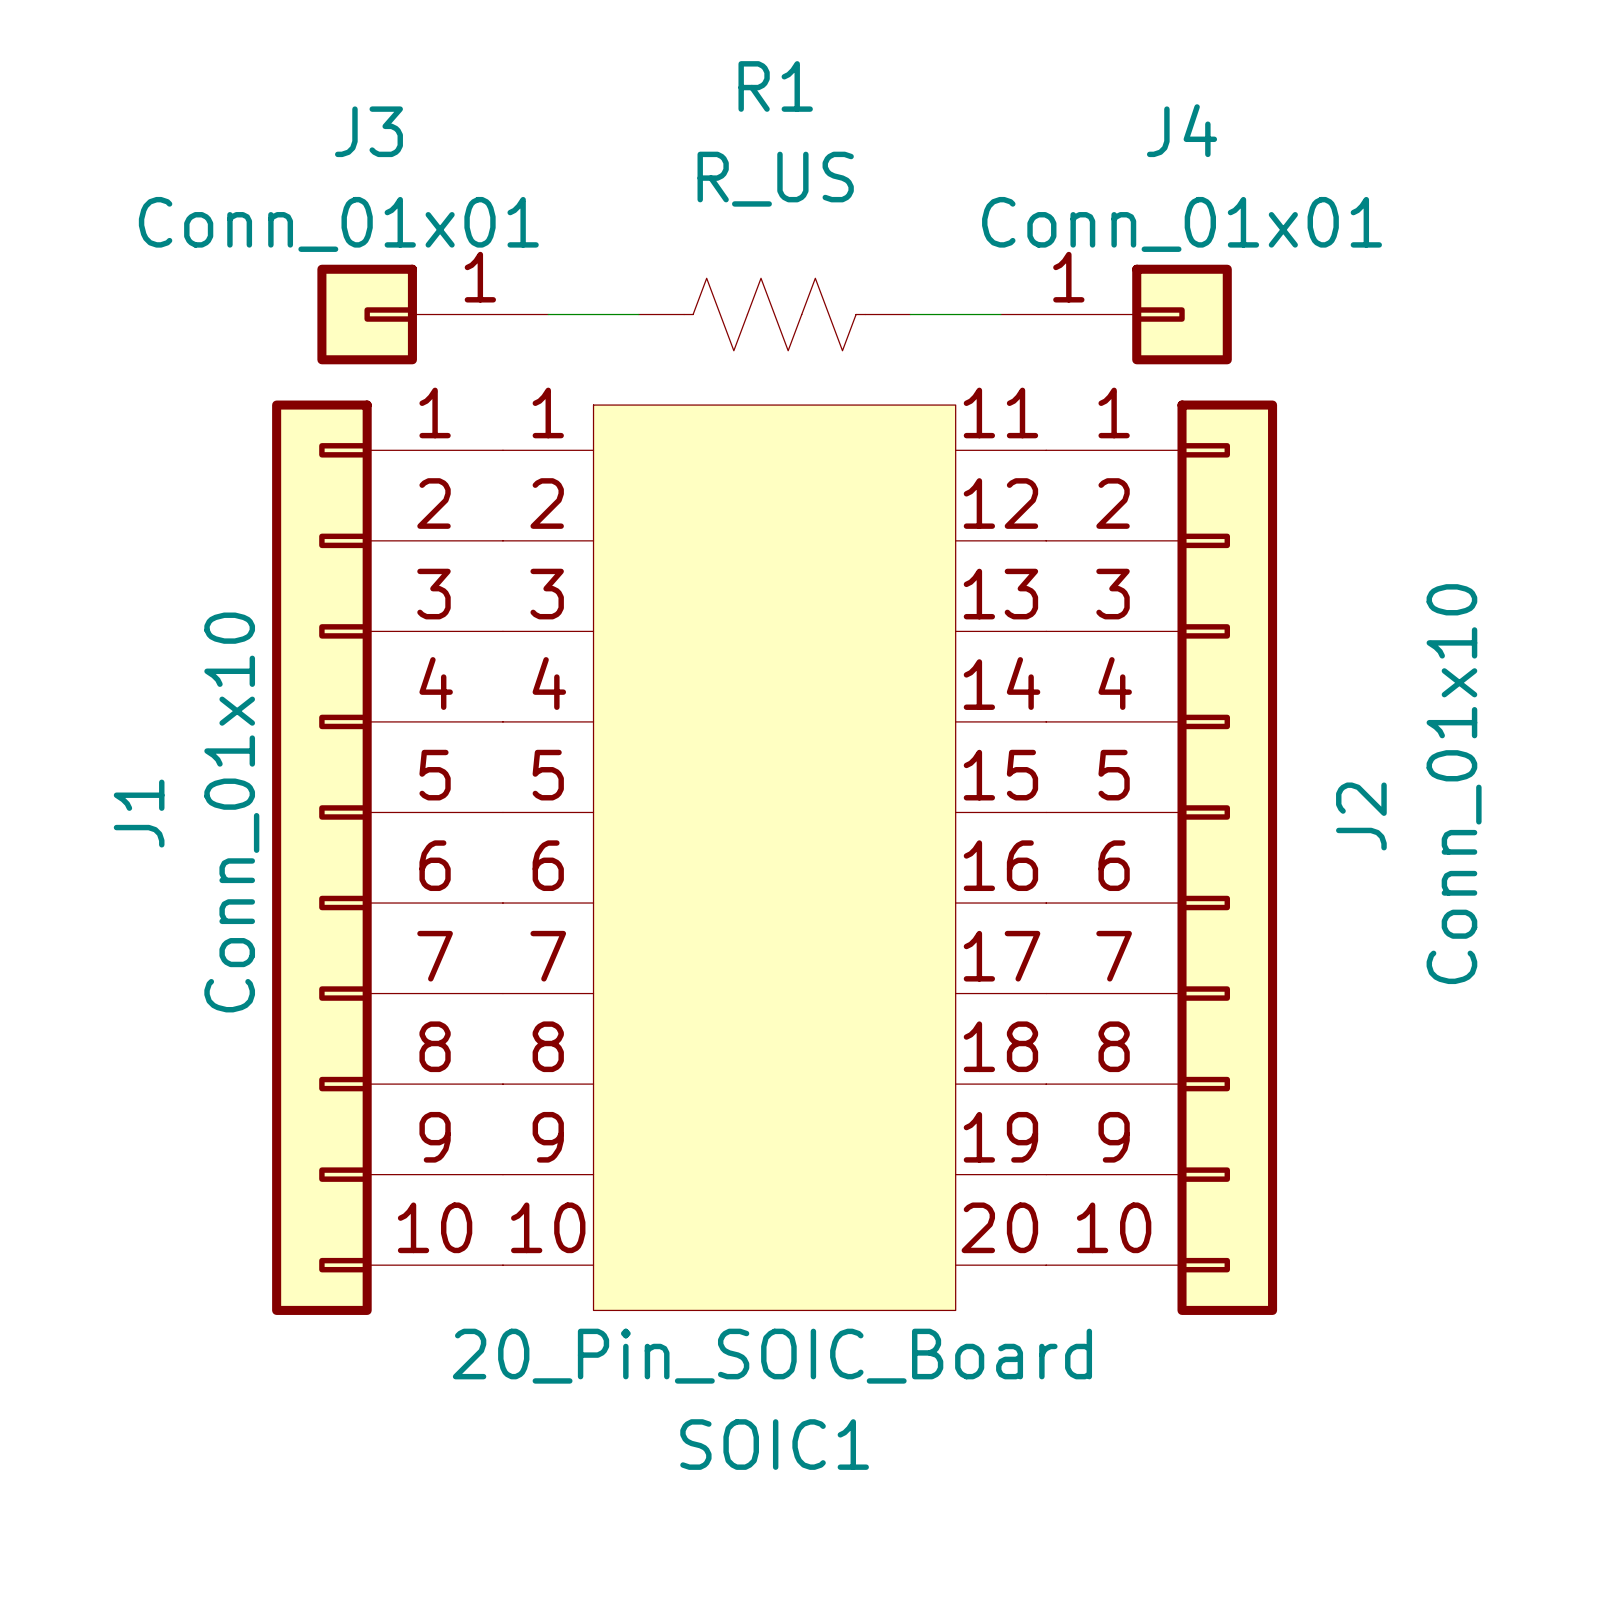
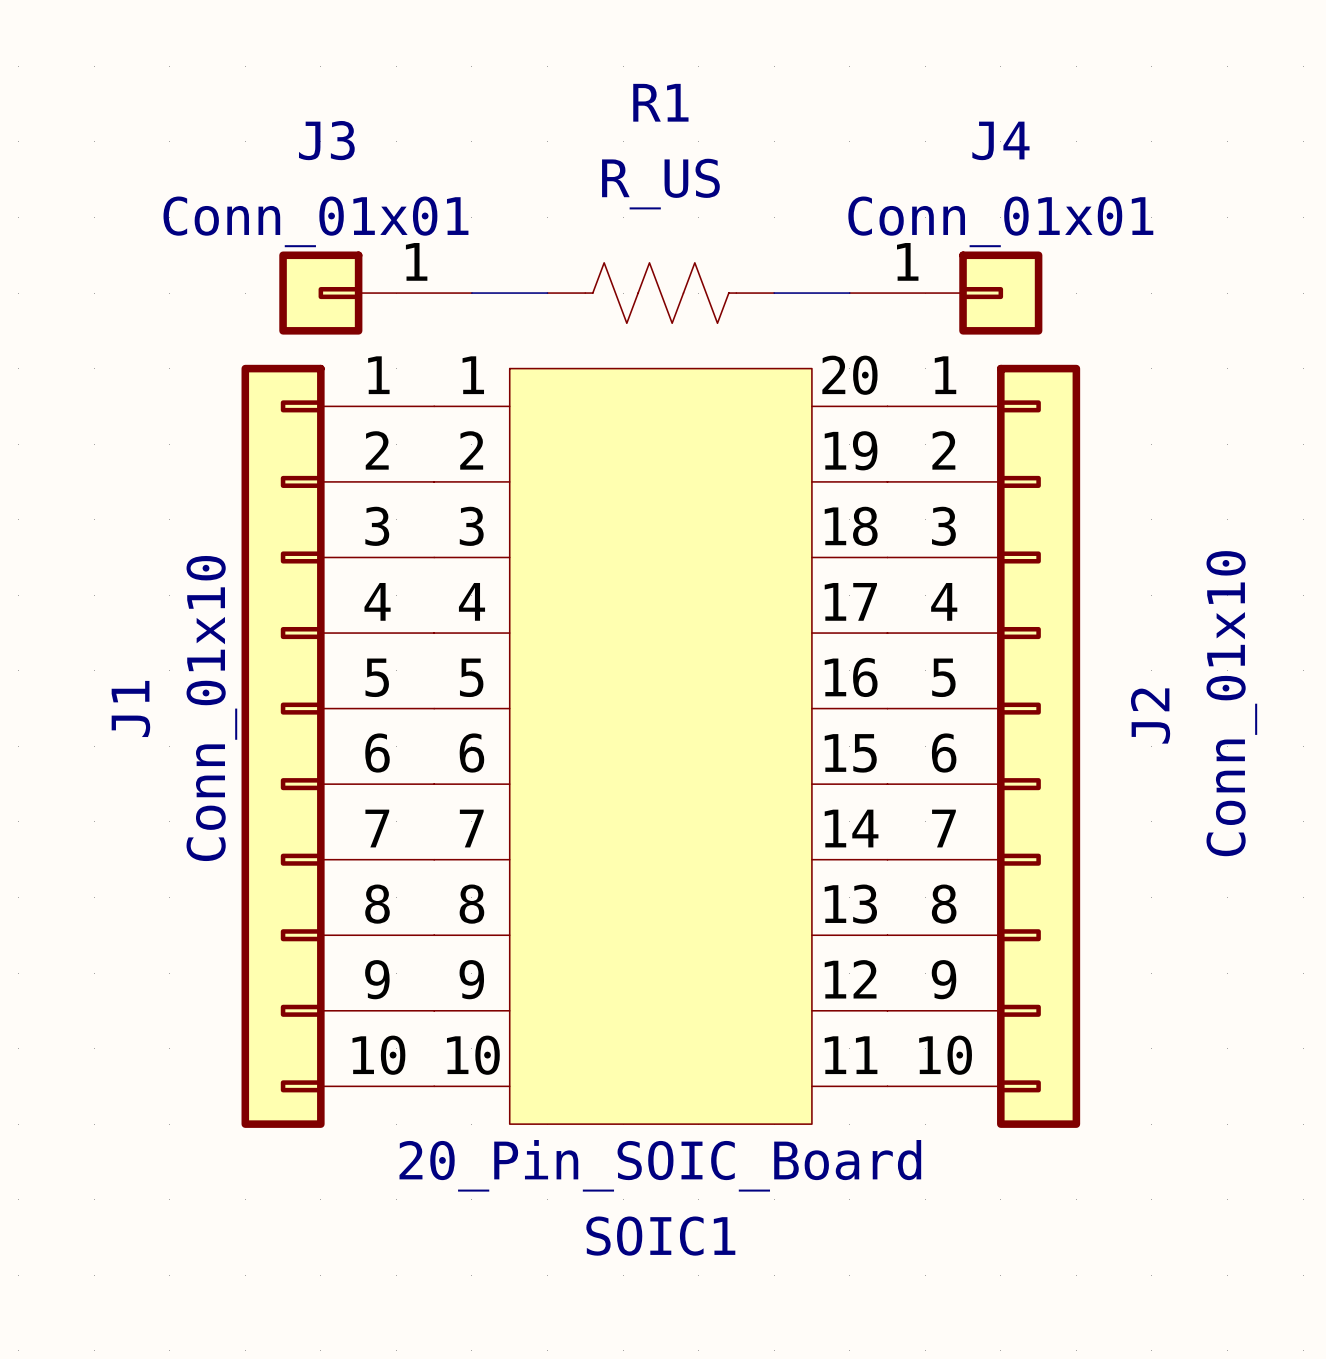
SOIC1 symbol: [502, 405, 1047, 1311] -> [434, 368, 888, 1125]

